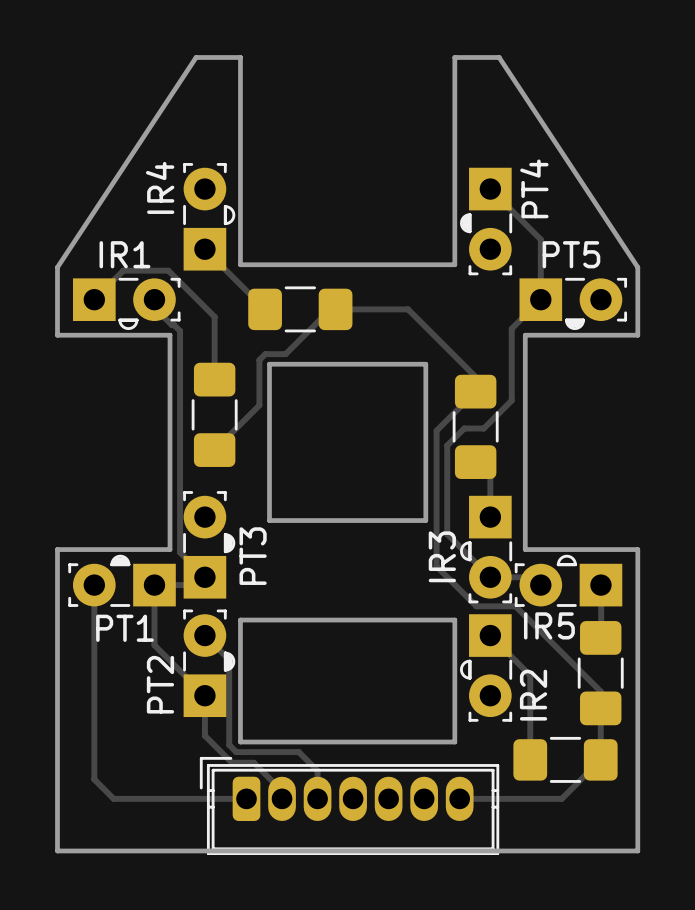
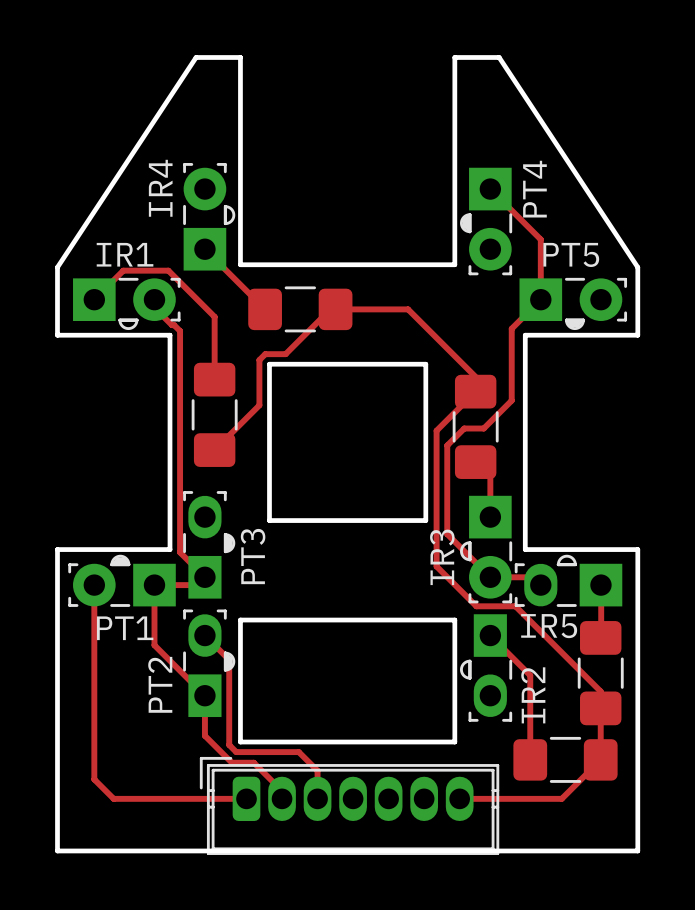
PT3 footprint: [183, 491, 236, 599] -> [183, 491, 236, 599]
IR5 footprint: [514, 554, 623, 607] -> [514, 554, 623, 607]
PT2 footprint: [183, 609, 236, 718] -> [183, 609, 236, 718]
IR2 footprint: [460, 614, 513, 722] -> [460, 614, 513, 722]

